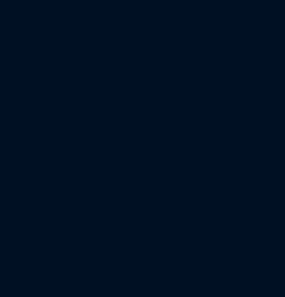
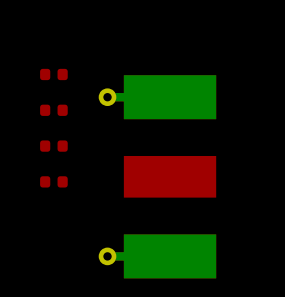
part: none -> (53, 74)
part: none -> (53, 110)
part: none -> (53, 146)
part: none -> (157, 176)
part: none -> (53, 181)

